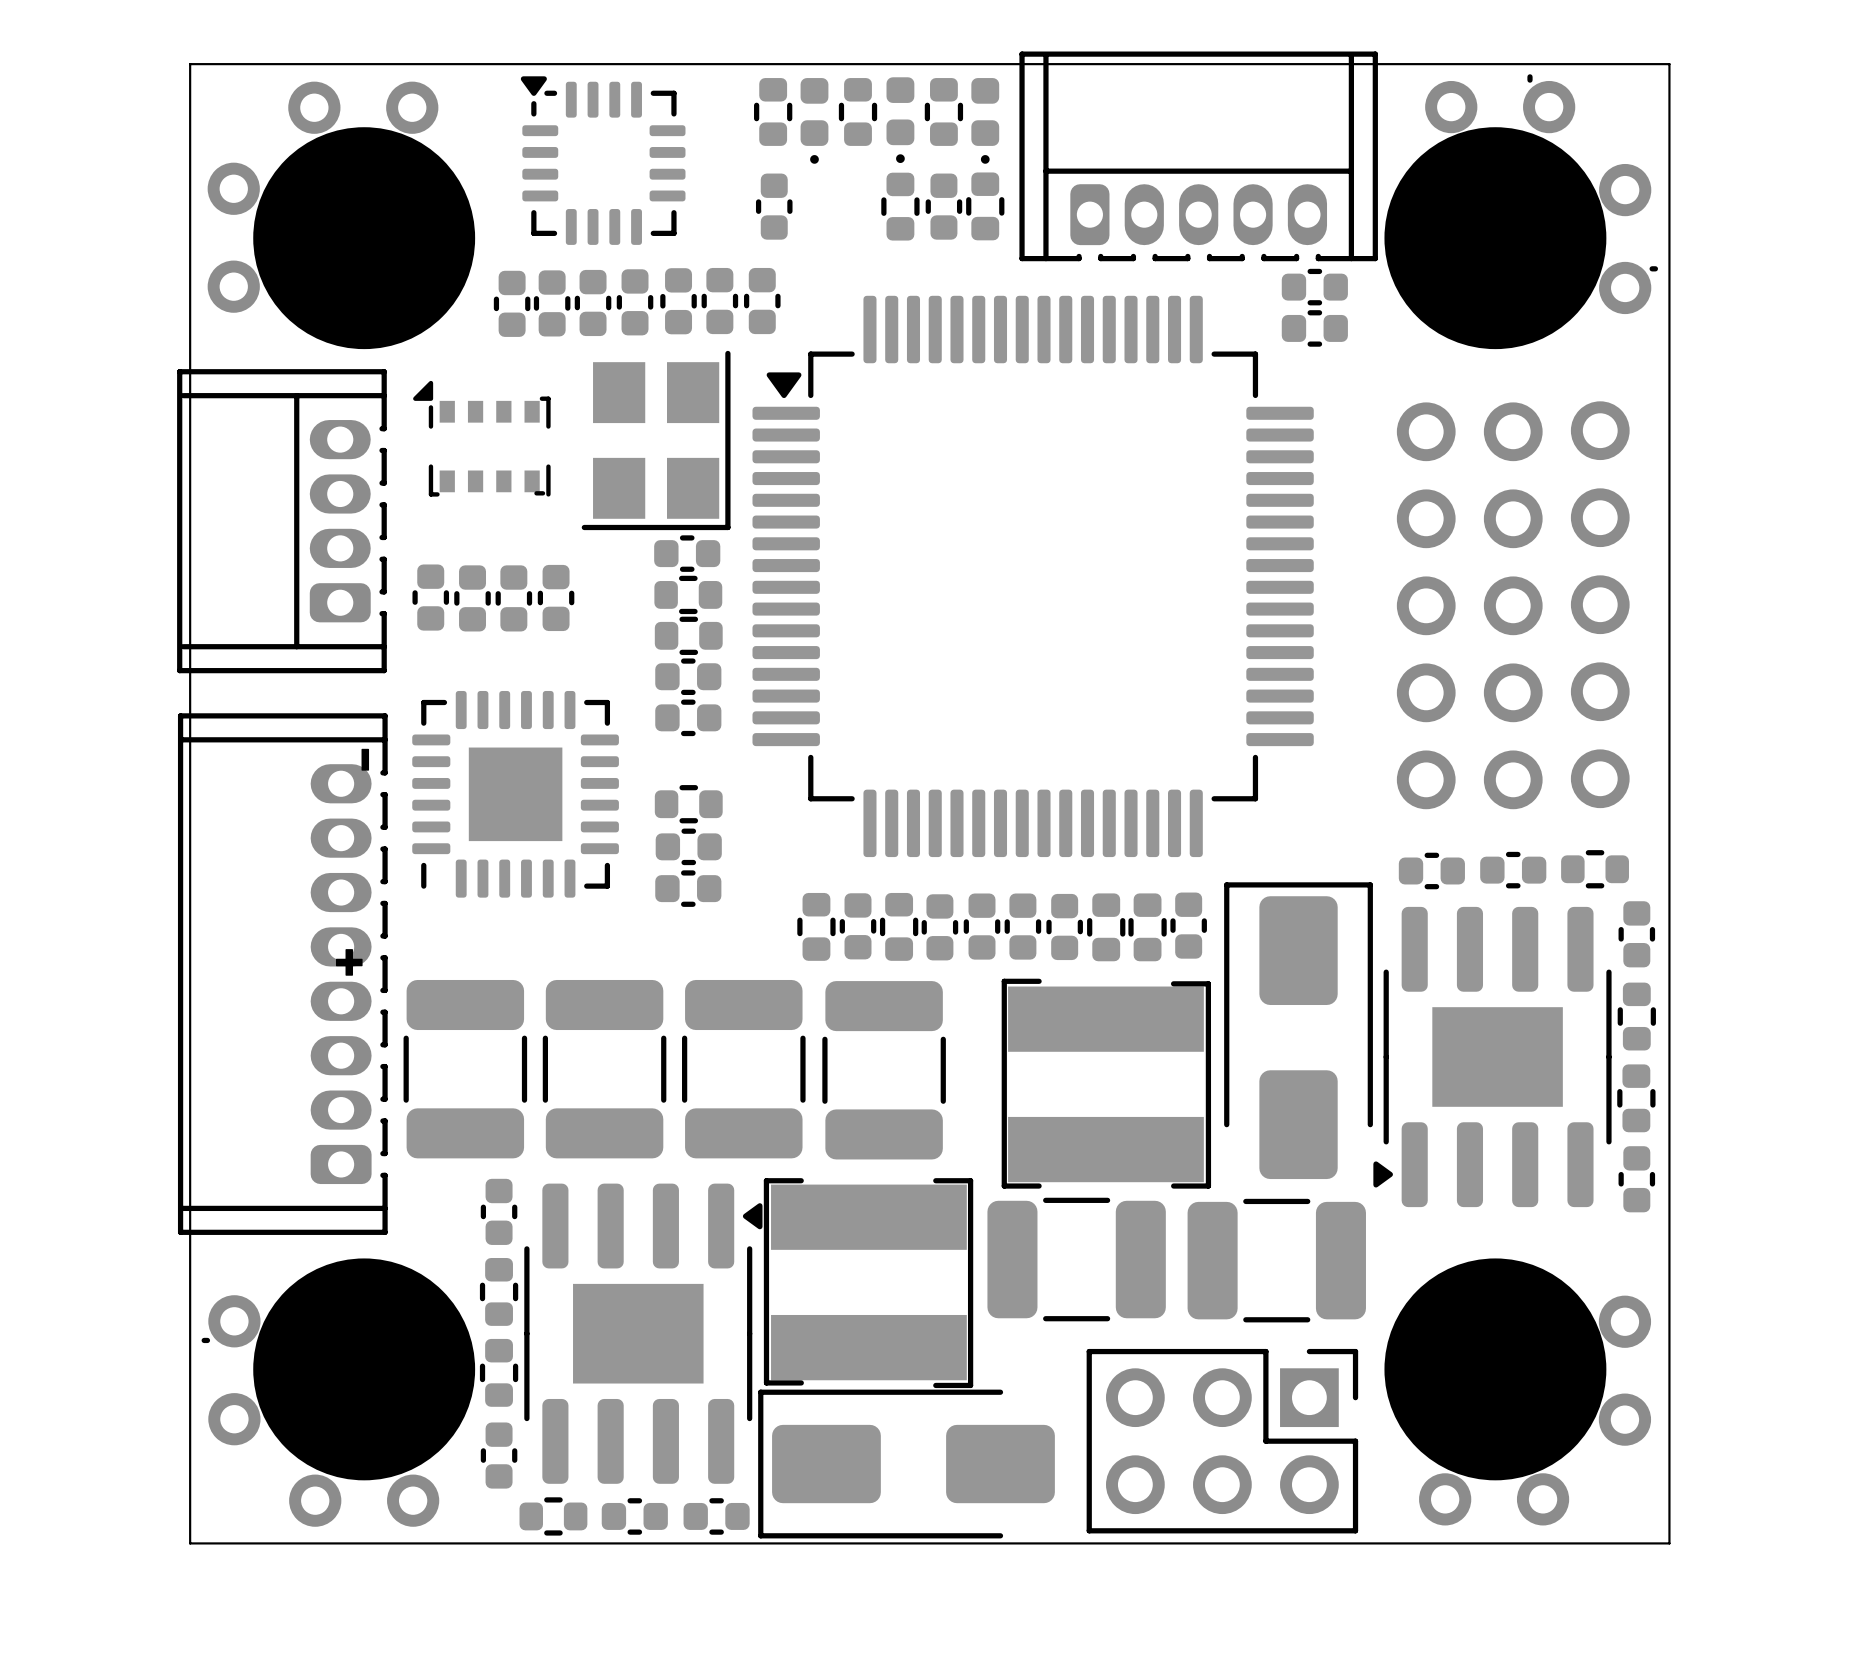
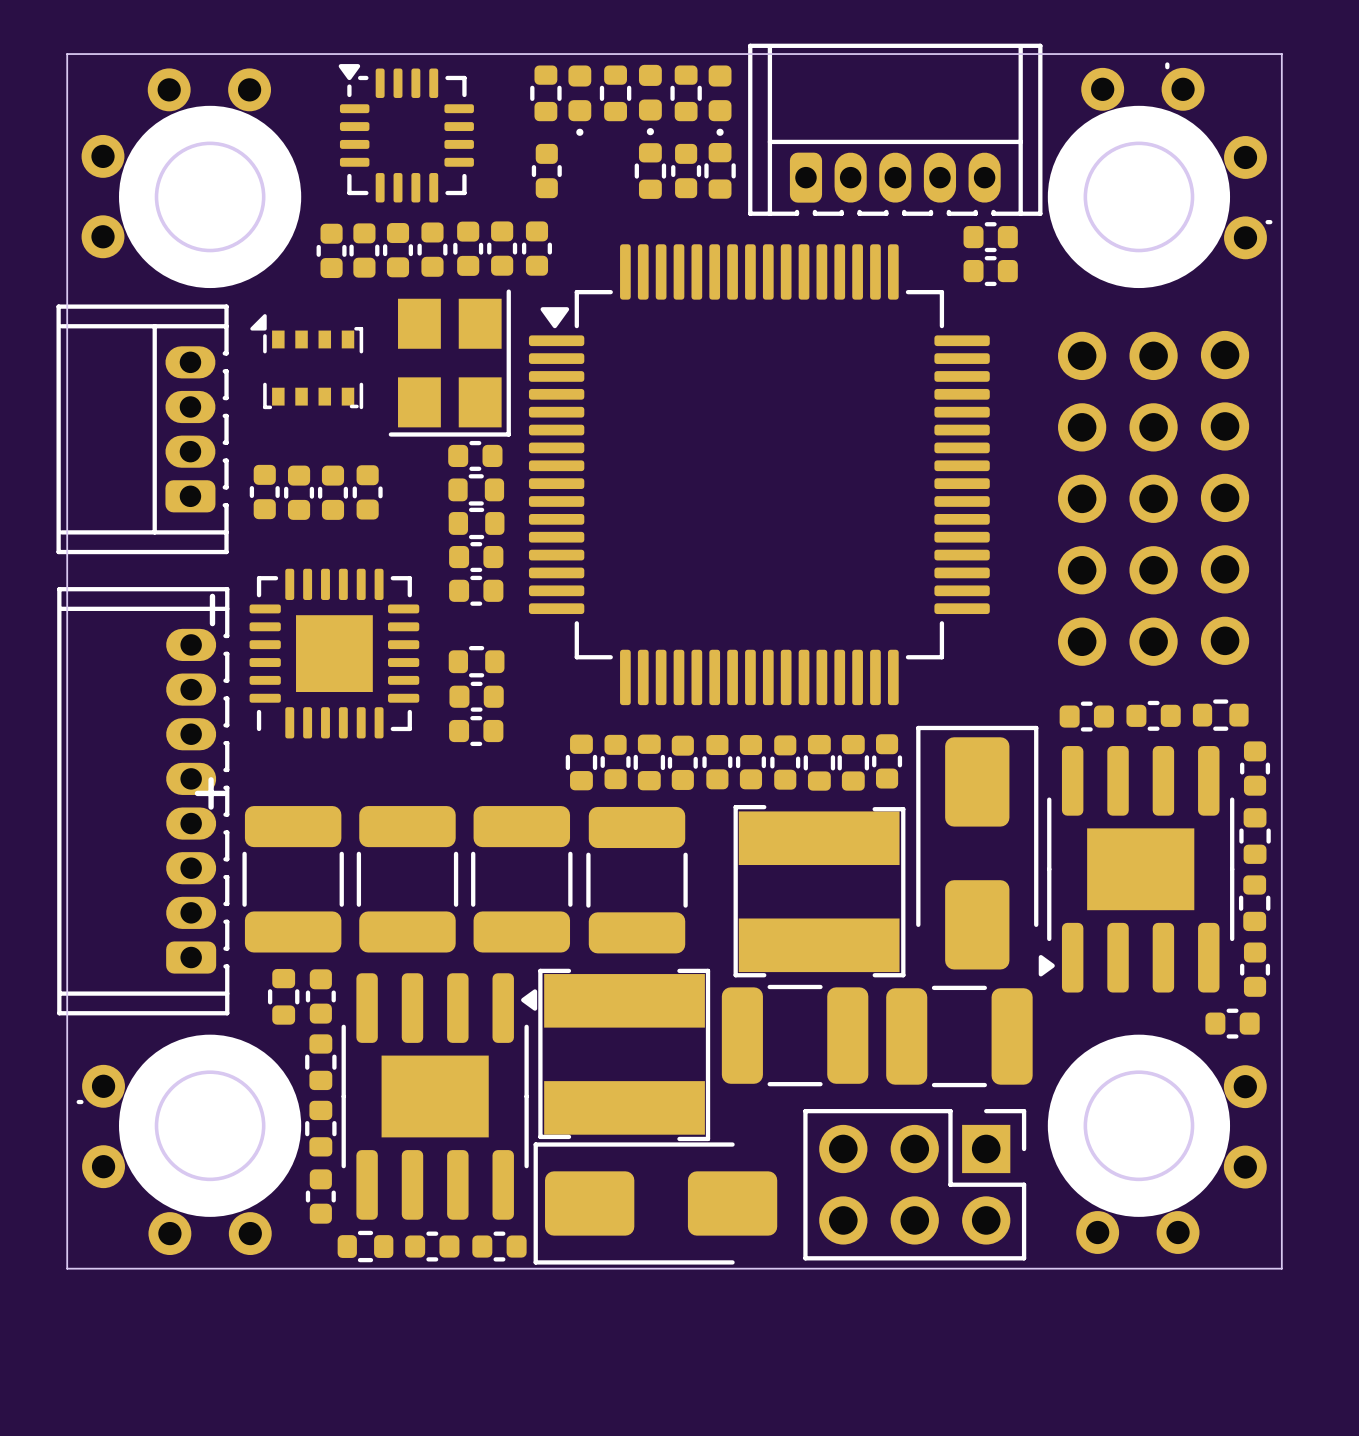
part: none -> (283, 996)
part: none -> (1232, 1023)

